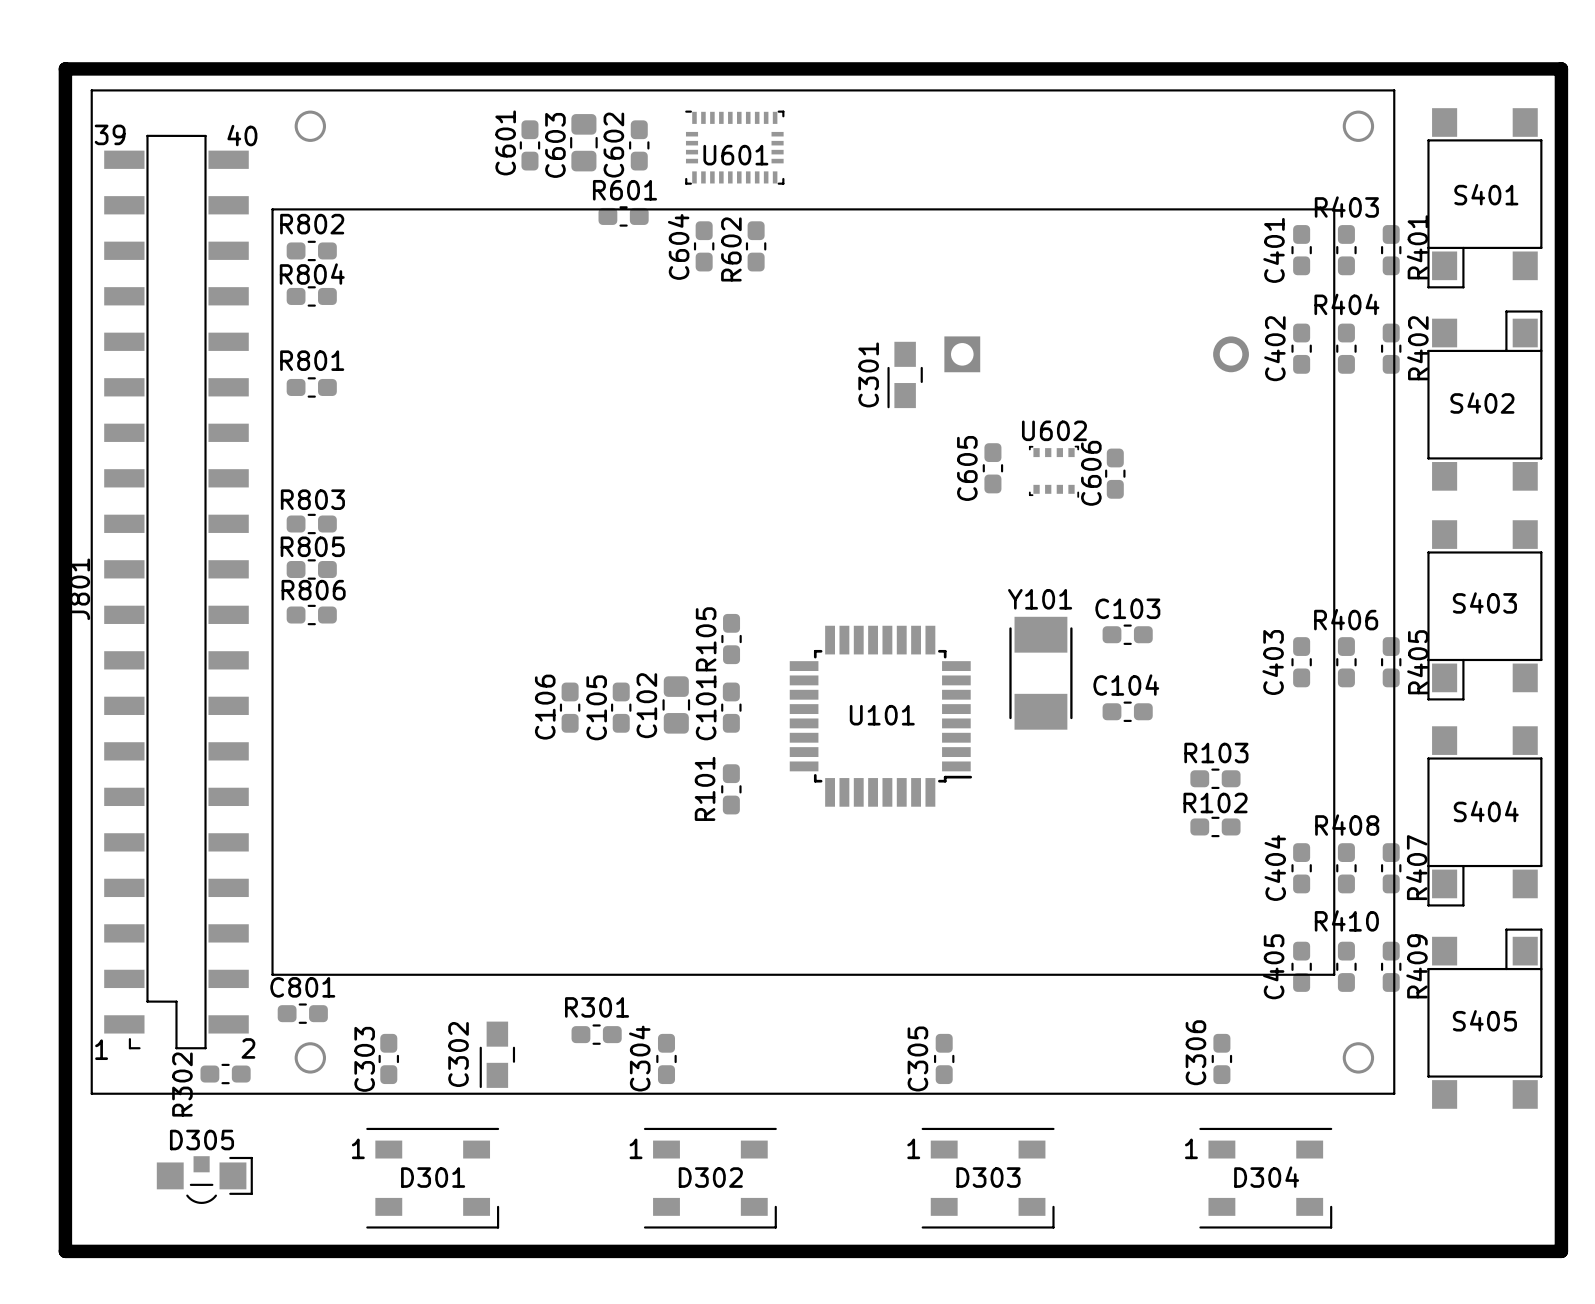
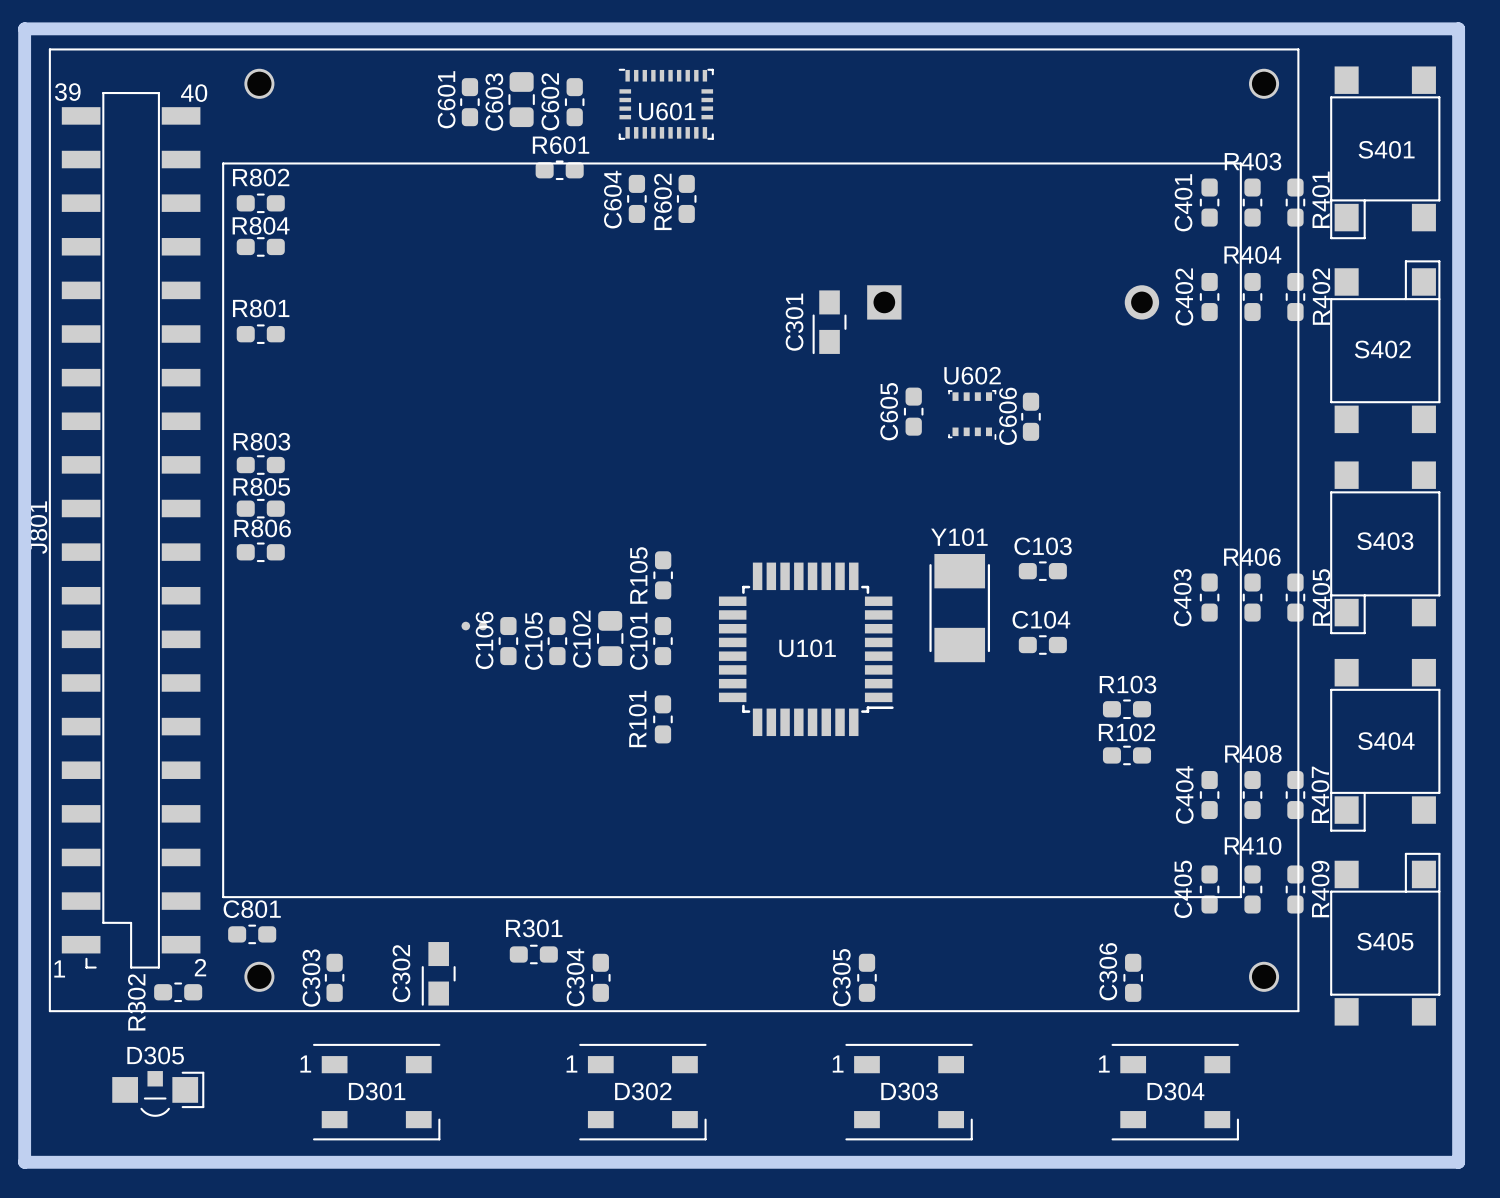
part: none -> (474, 626)

